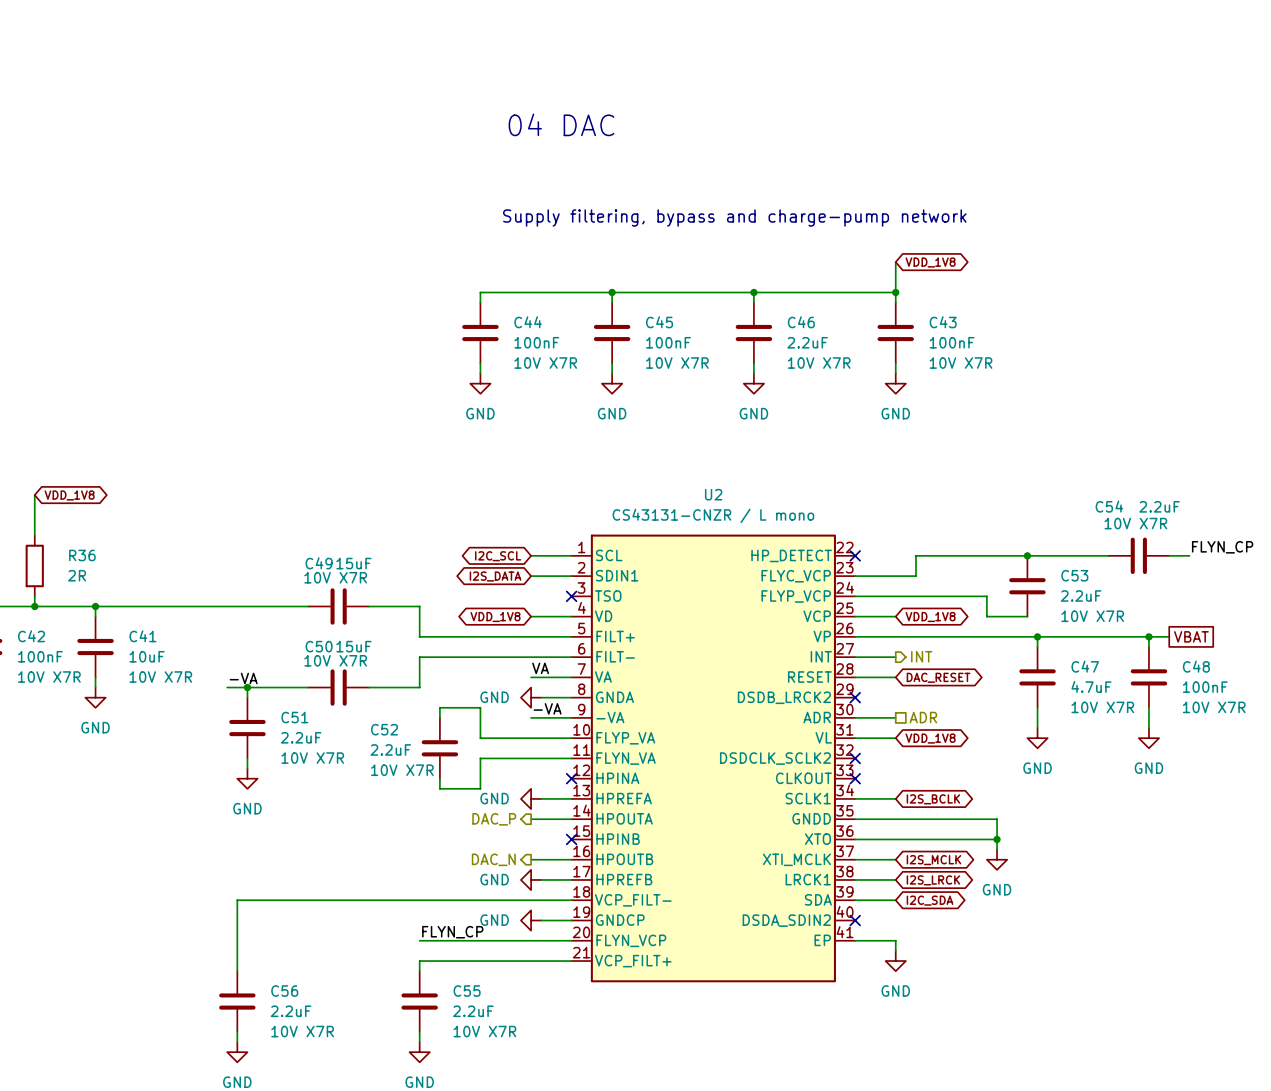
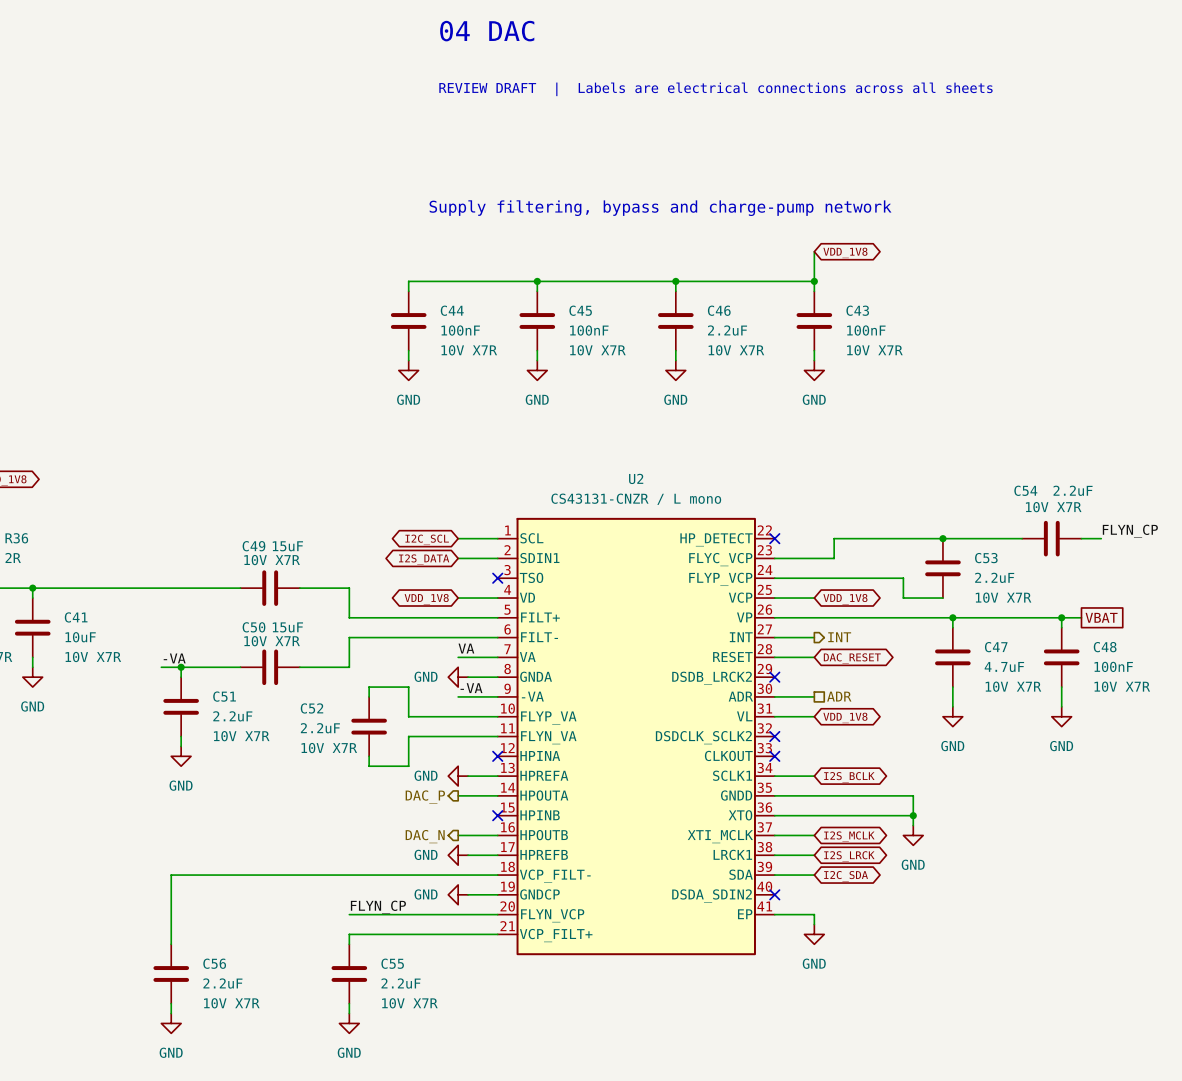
text: none -> REVIEW DRAFT | Labels are electrical connections across all sheets (715, 89)
text position: 04 DAC (561, 124) -> 04 DAC (487, 31)

